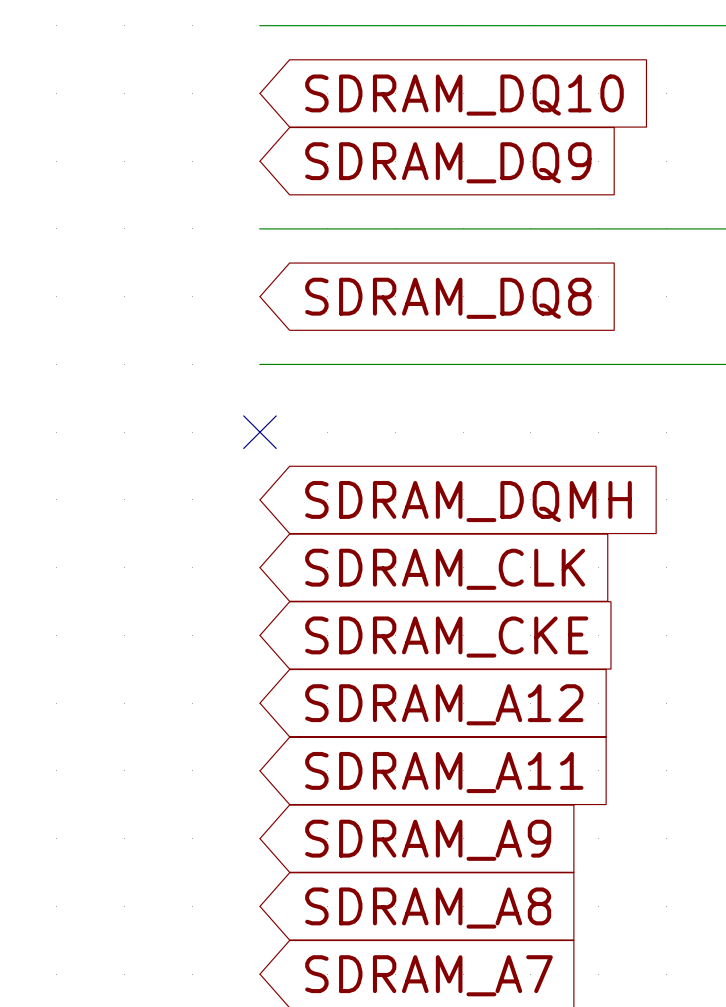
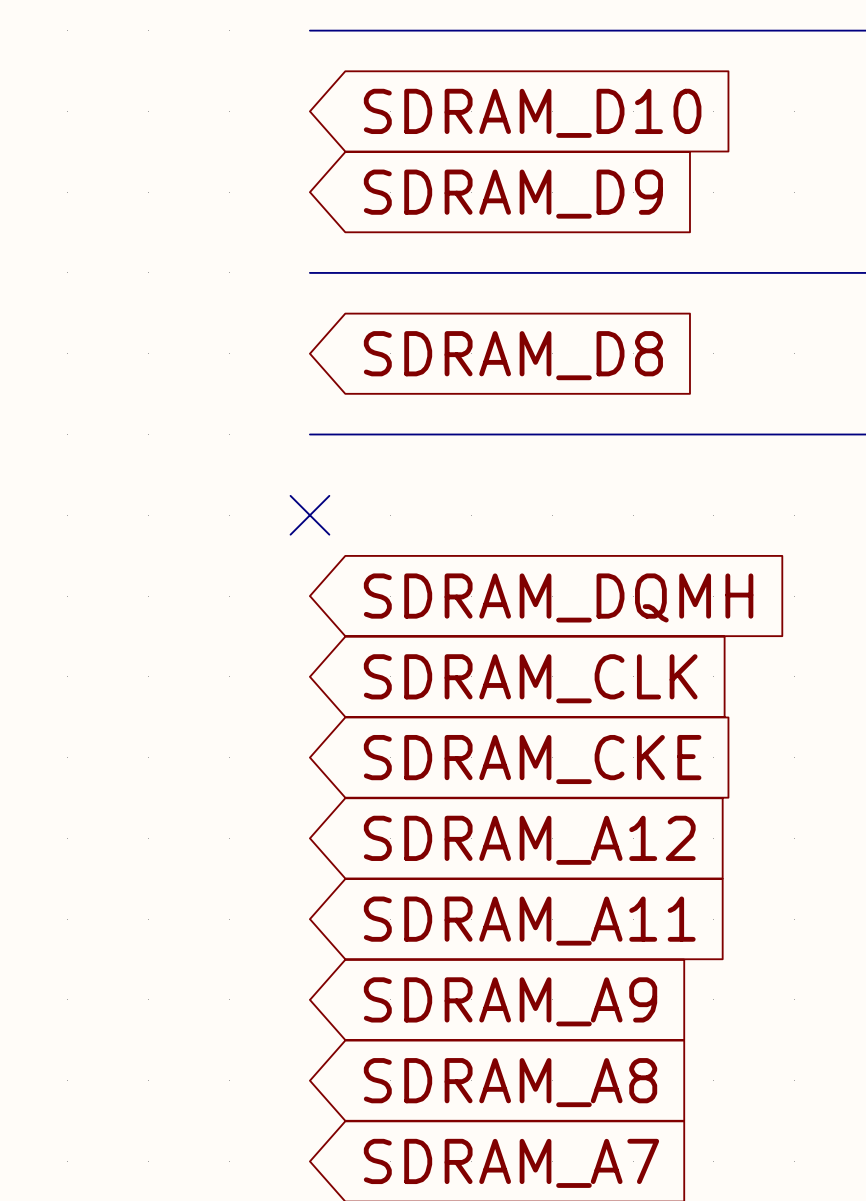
global label: SDRAM_DQ10 (464, 95) -> SDRAM_D10 (532, 113)
global label: SDRAM_DQ9 (448, 162) -> SDRAM_D9 (513, 194)
global label: SDRAM_DQ8 (448, 298) -> SDRAM_D8 (513, 355)

